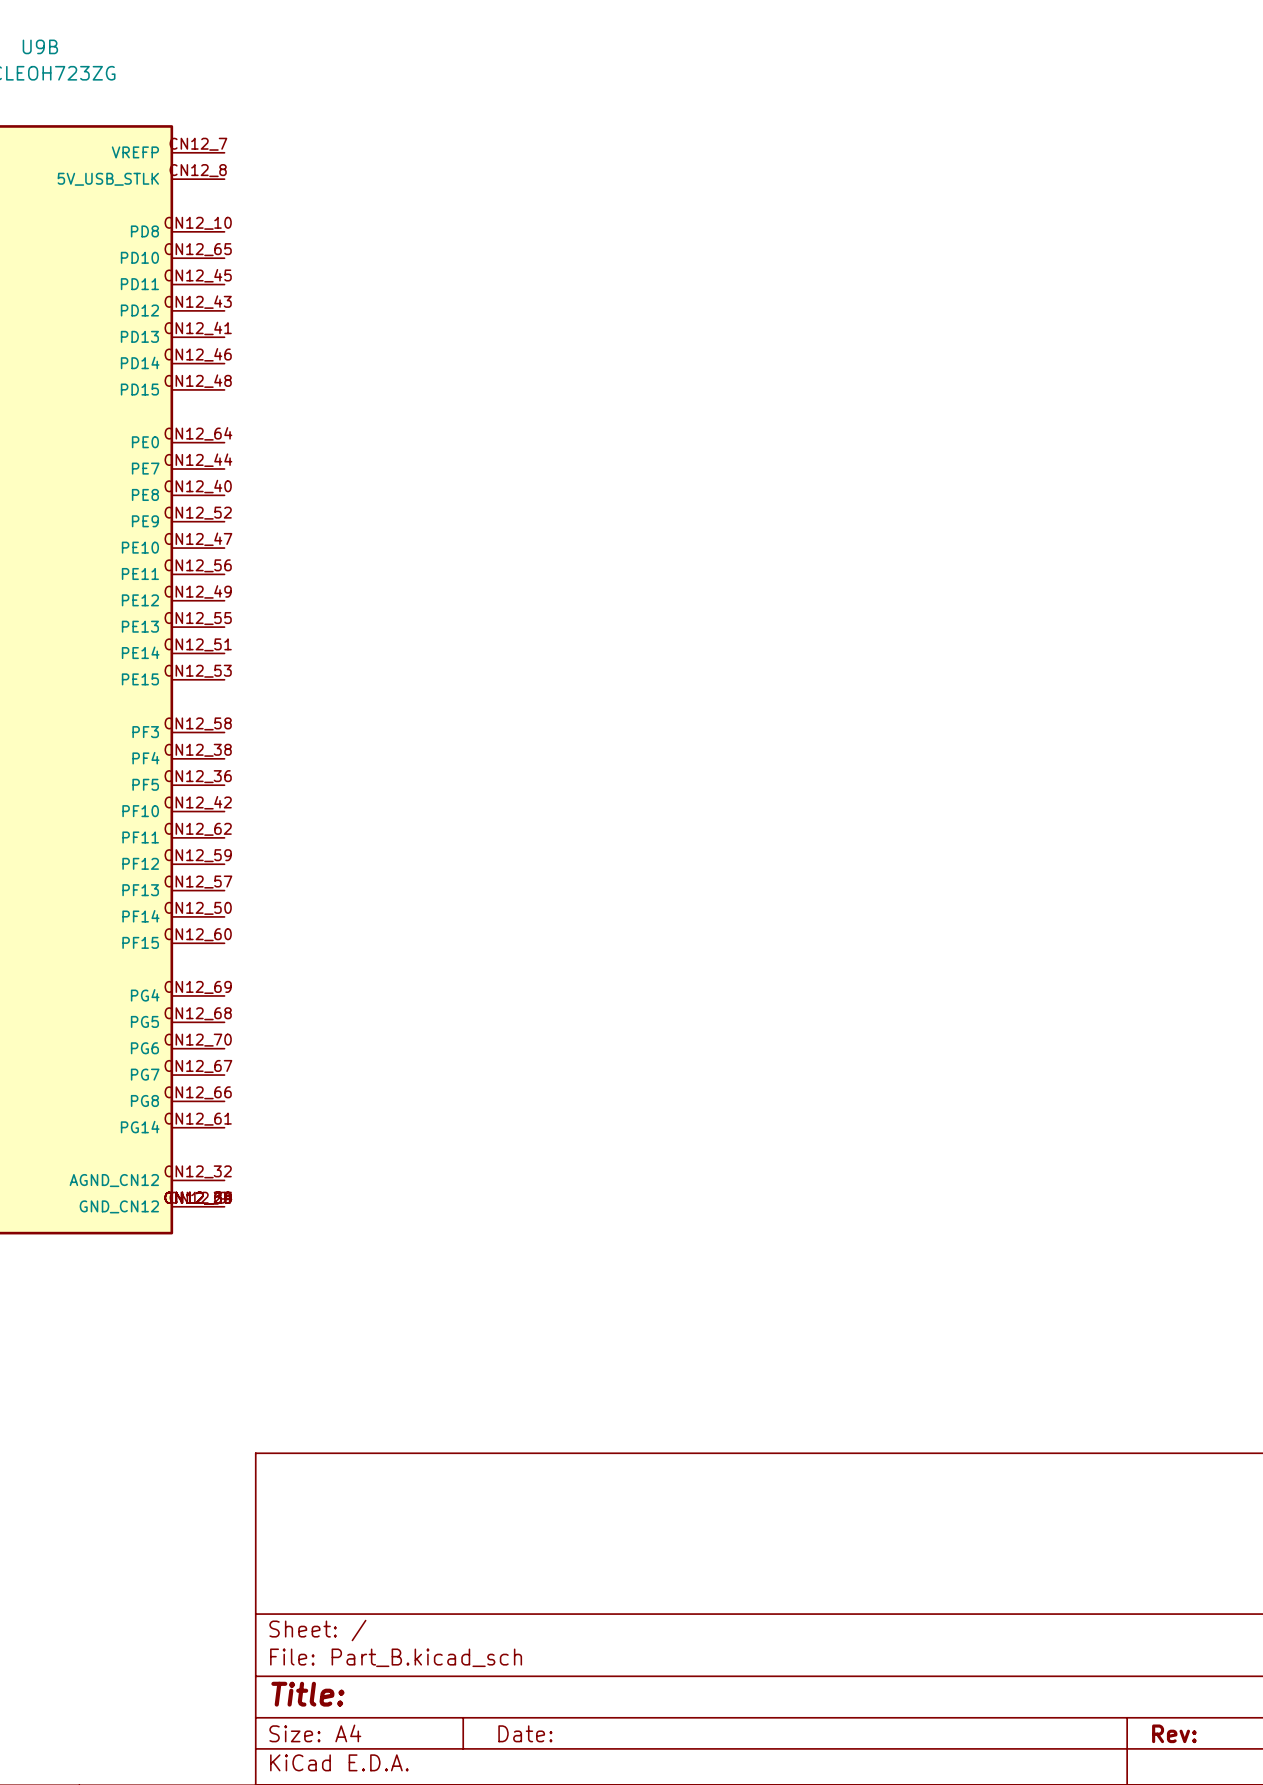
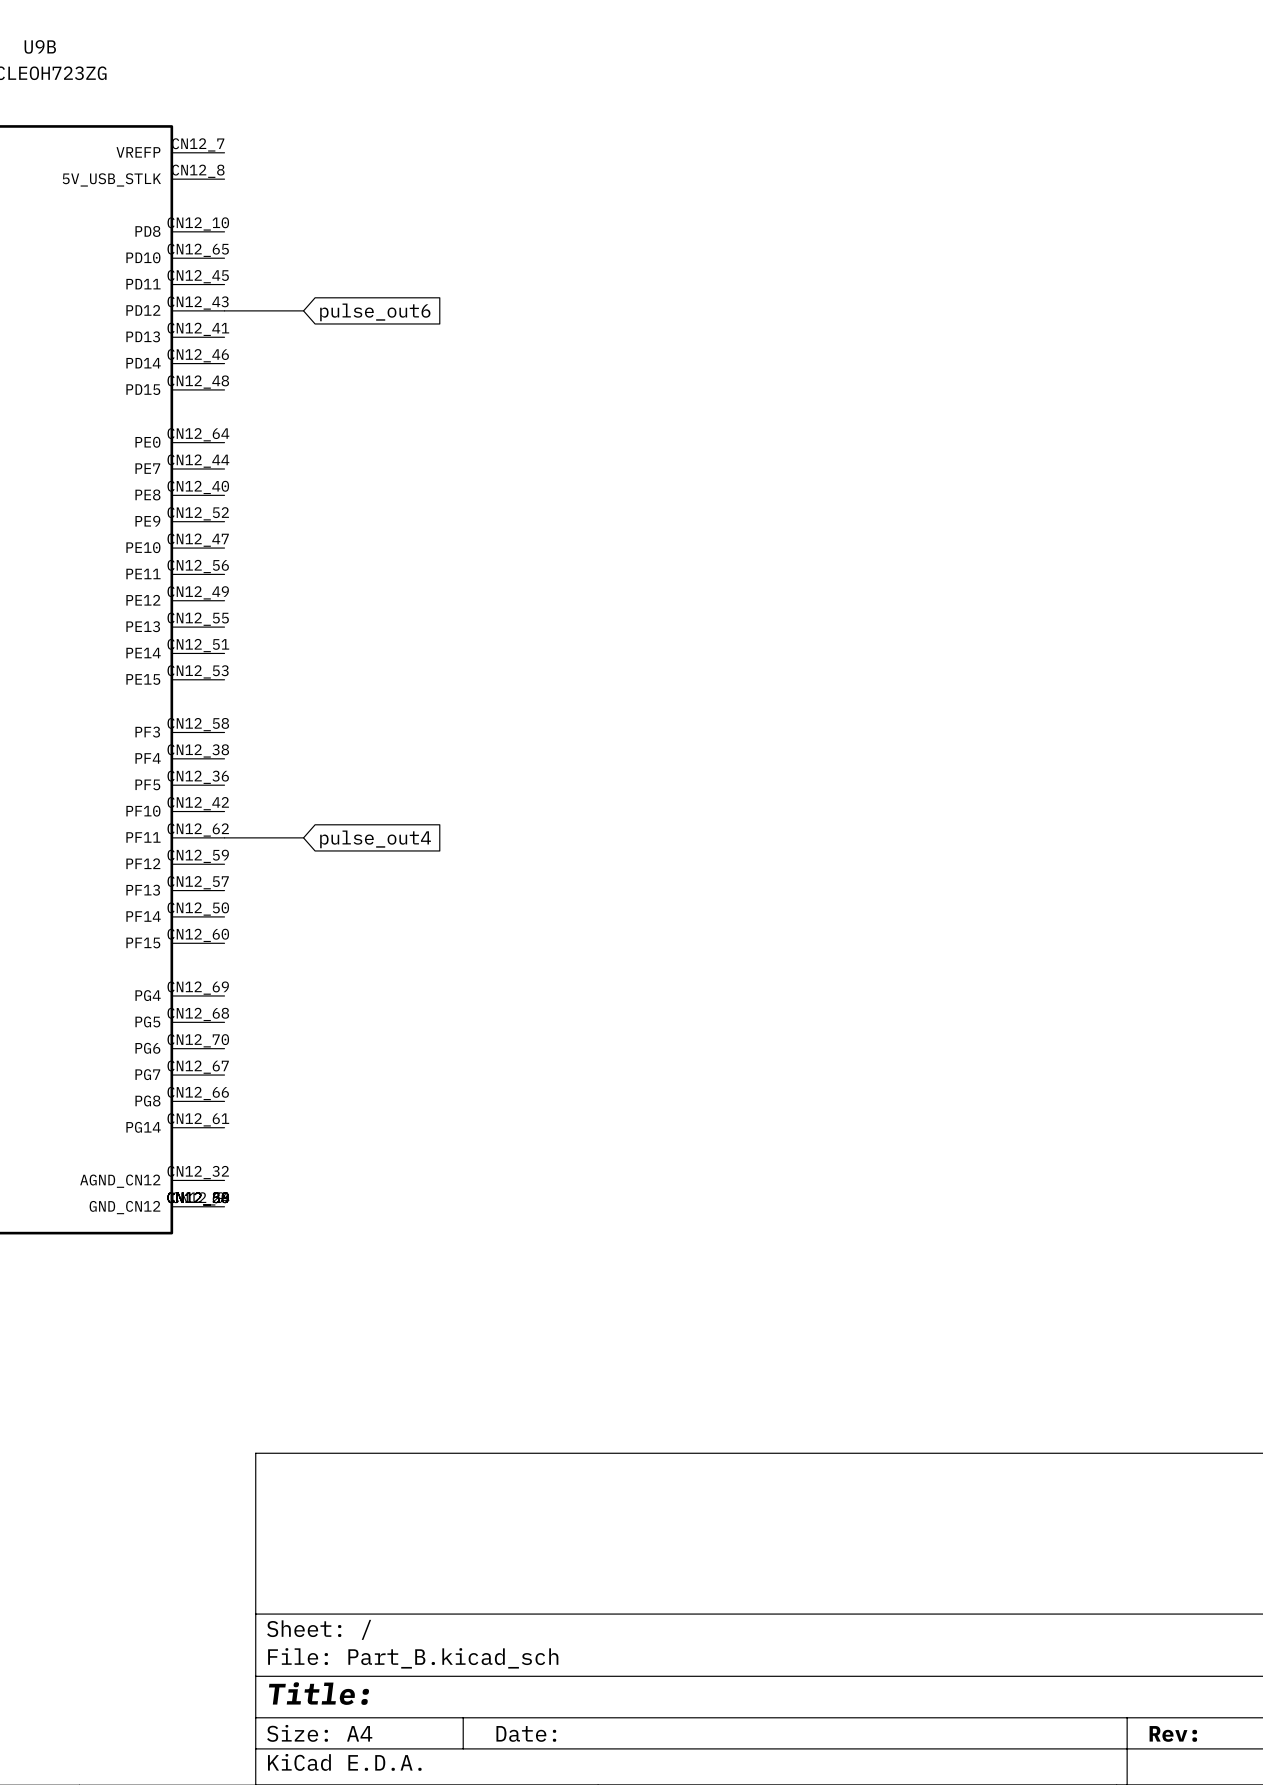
wire: none -> (224, 310) (303, 310)
global label: none -> pulse_out6 (375, 312)
wire: none -> (224, 837) (303, 837)
global label: none -> pulse_out4 (375, 839)

